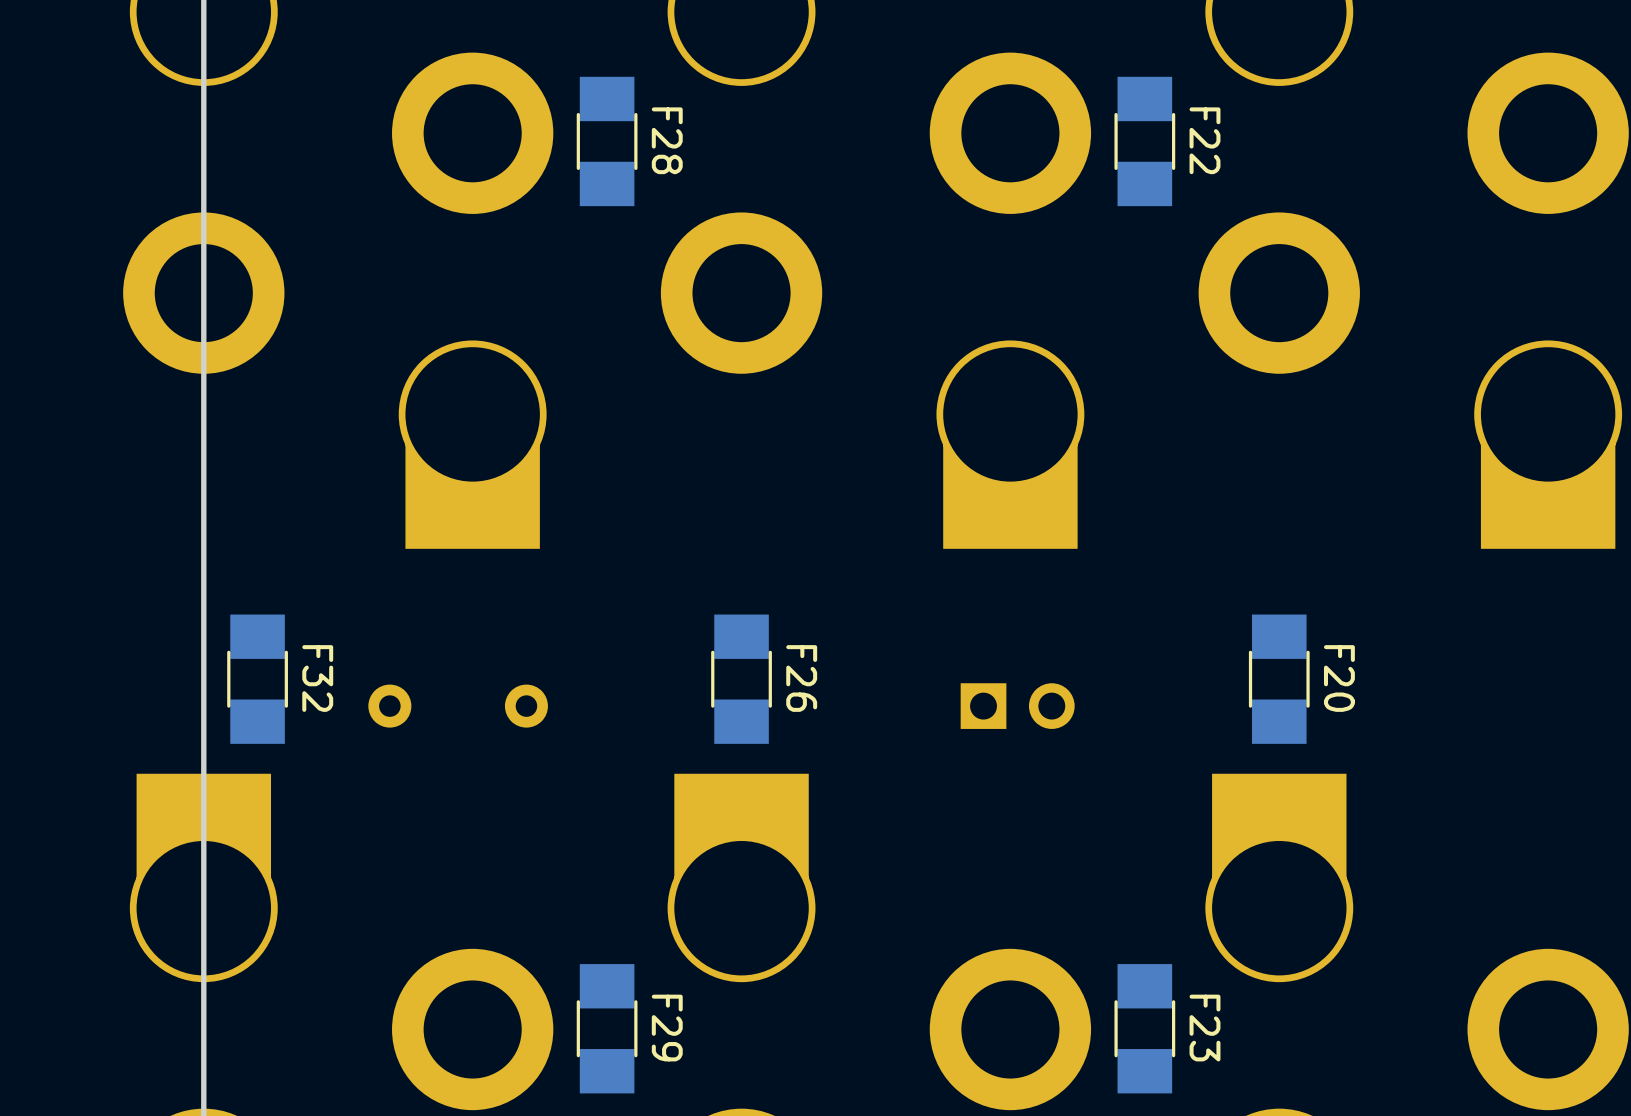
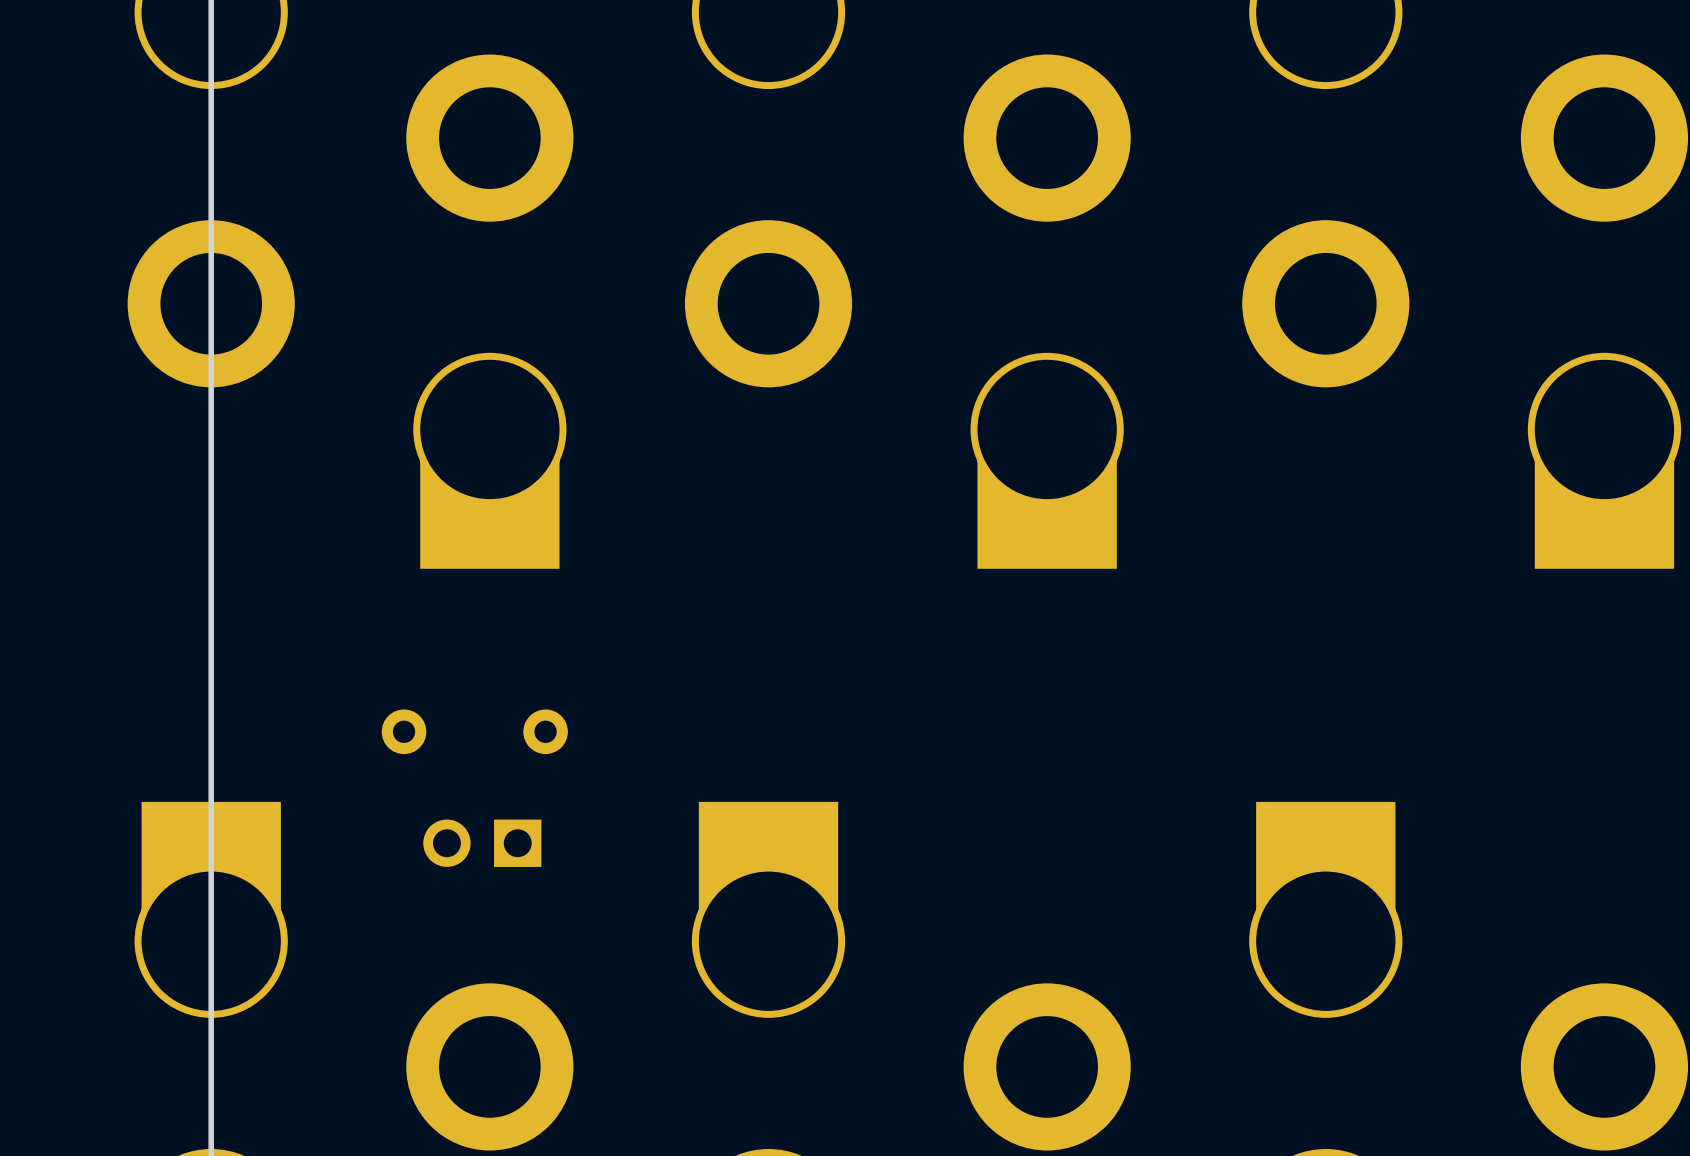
F28: (607, 141) -> none
F22: (1144, 141) -> none
F32: (257, 679) -> none
F26: (741, 679) -> none
F20: (1279, 679) -> none
part rotation: 0° (1017, 706) -> 180° (482, 843)
part position: (1017, 706) -> (482, 843)
F29: (607, 1028) -> none
F23: (1144, 1028) -> none

